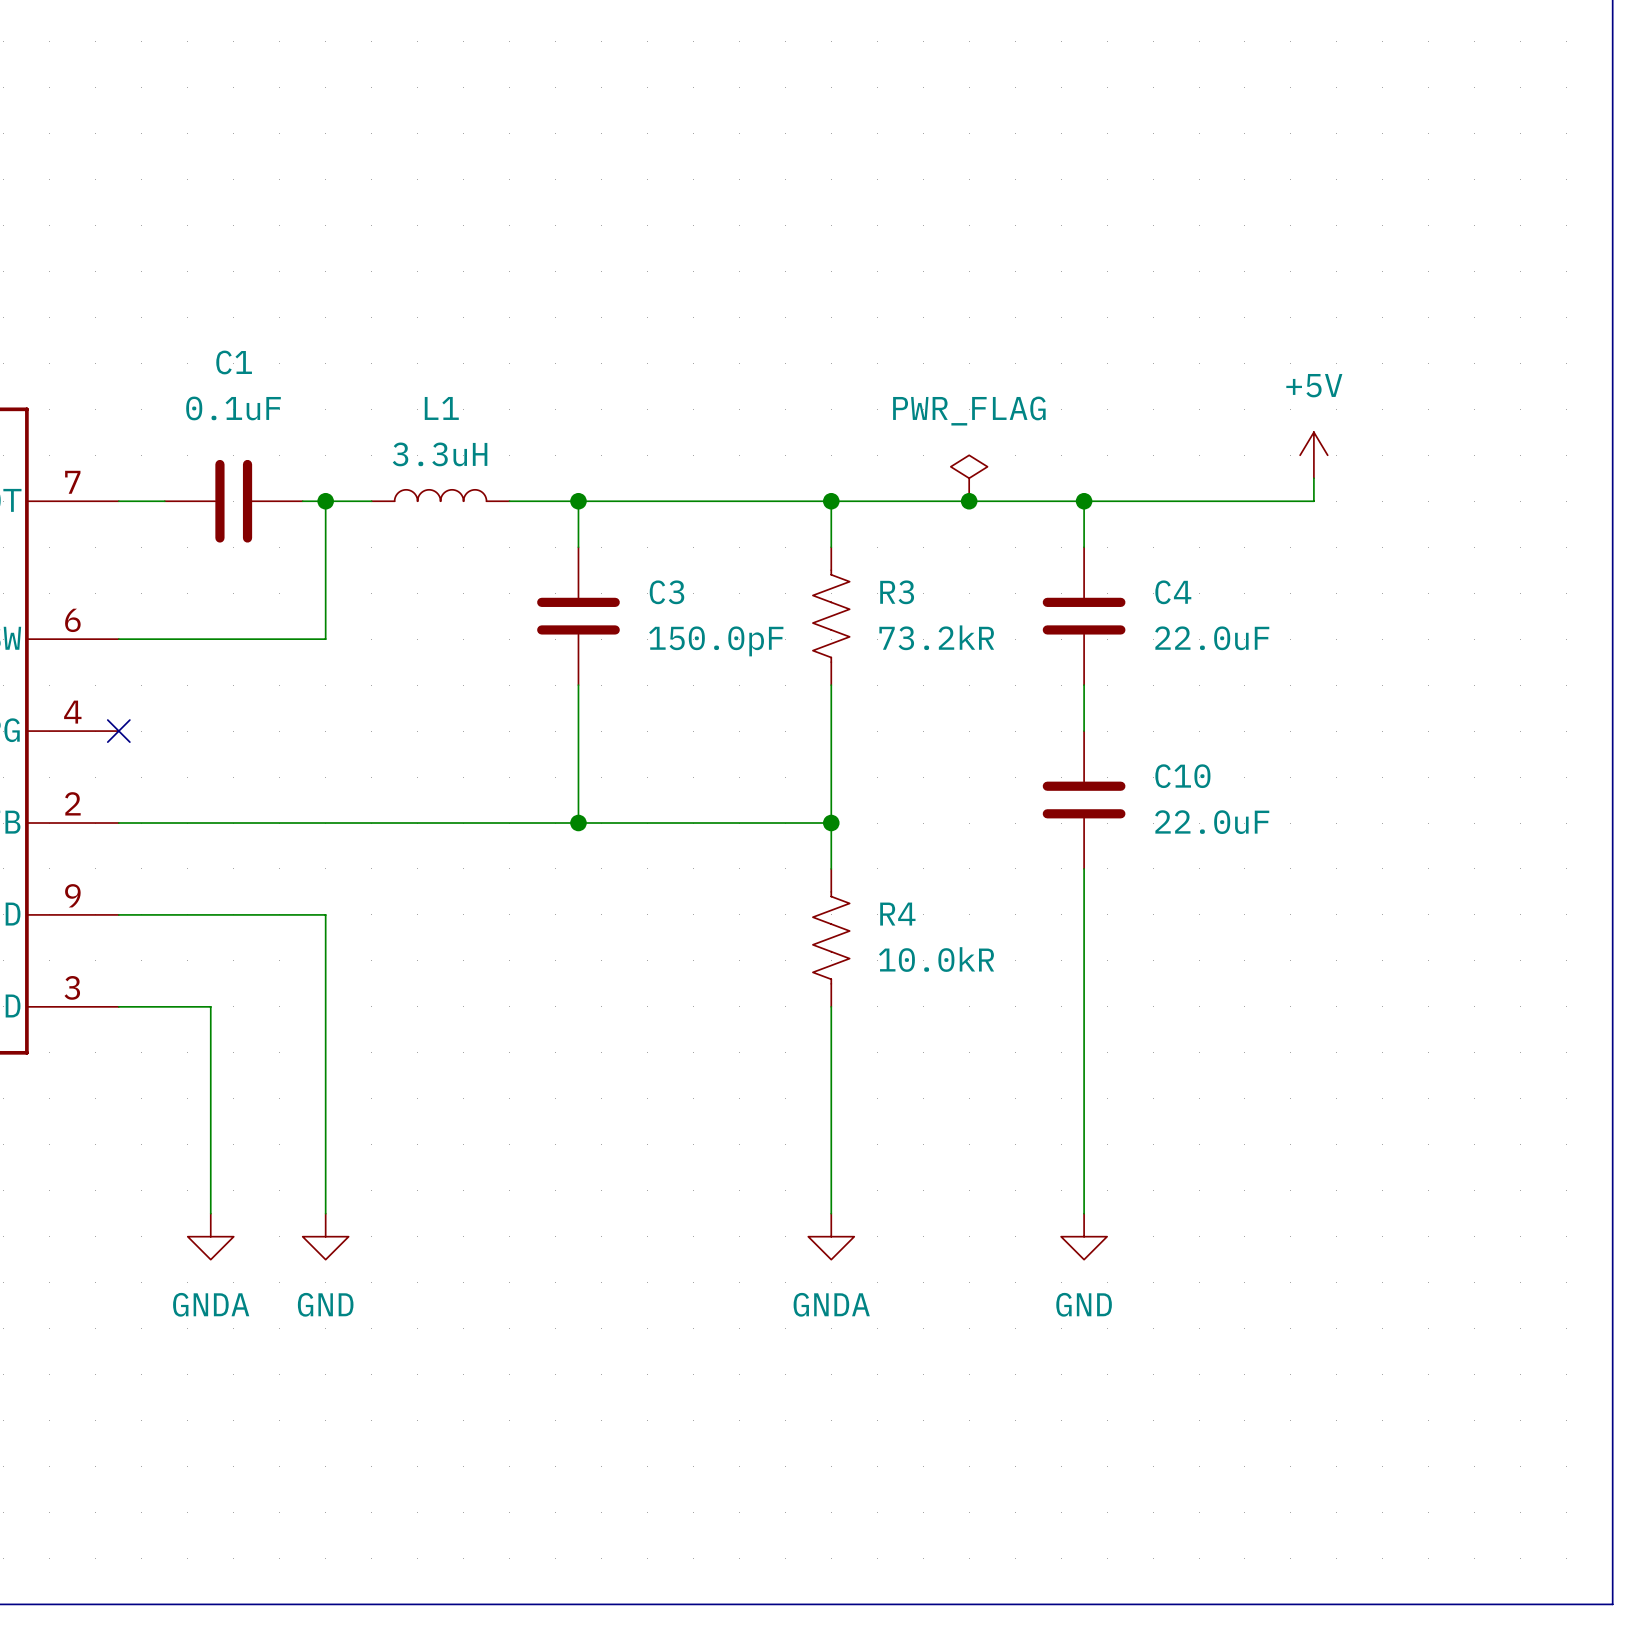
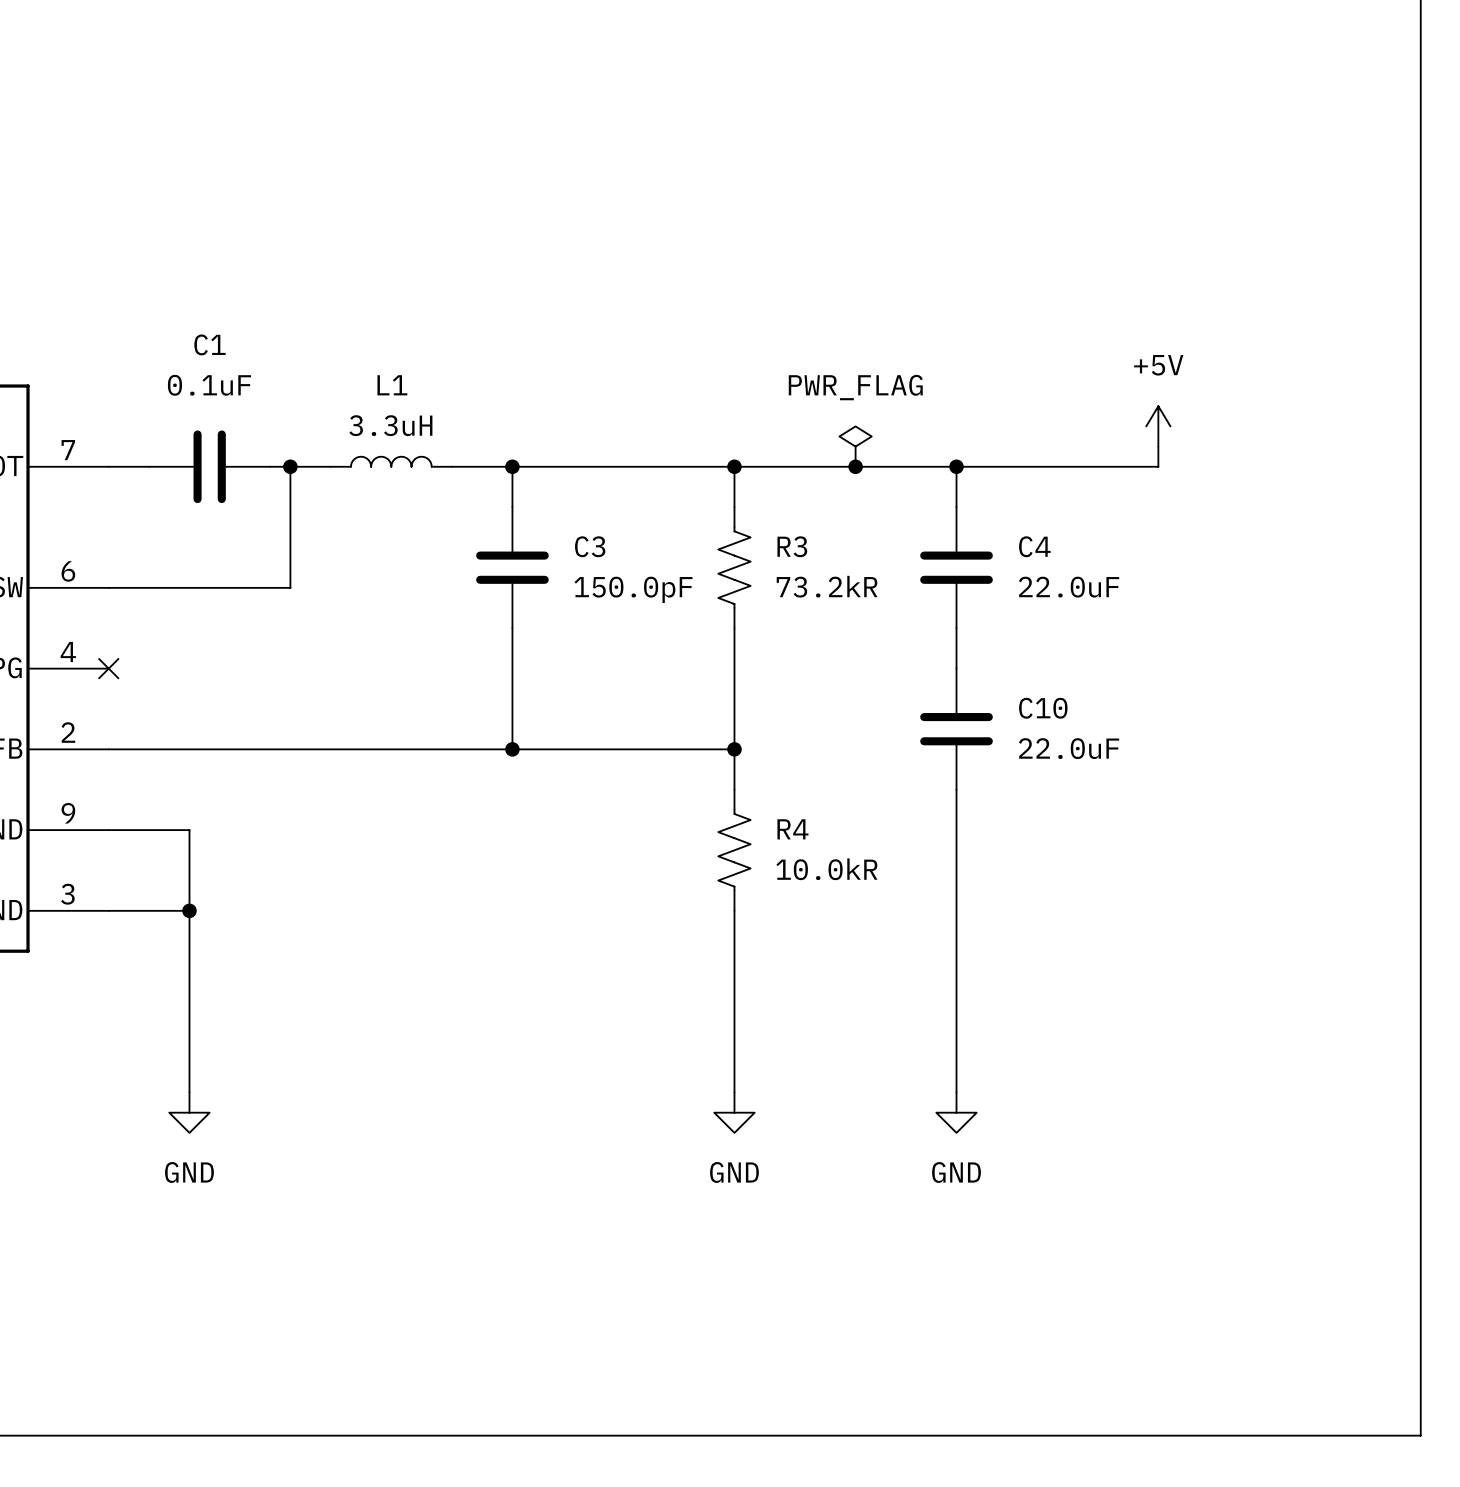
wire: (210, 914) (325, 914) (325, 1213) -> (189, 830) (189, 910)
junction: none -> (189, 910)
power symbol: GNDA (210, 1236) -> GND (189, 1112)
power symbol: GND (325, 1236) -> none
power symbol: GNDA (831, 1236) -> GND (734, 1112)

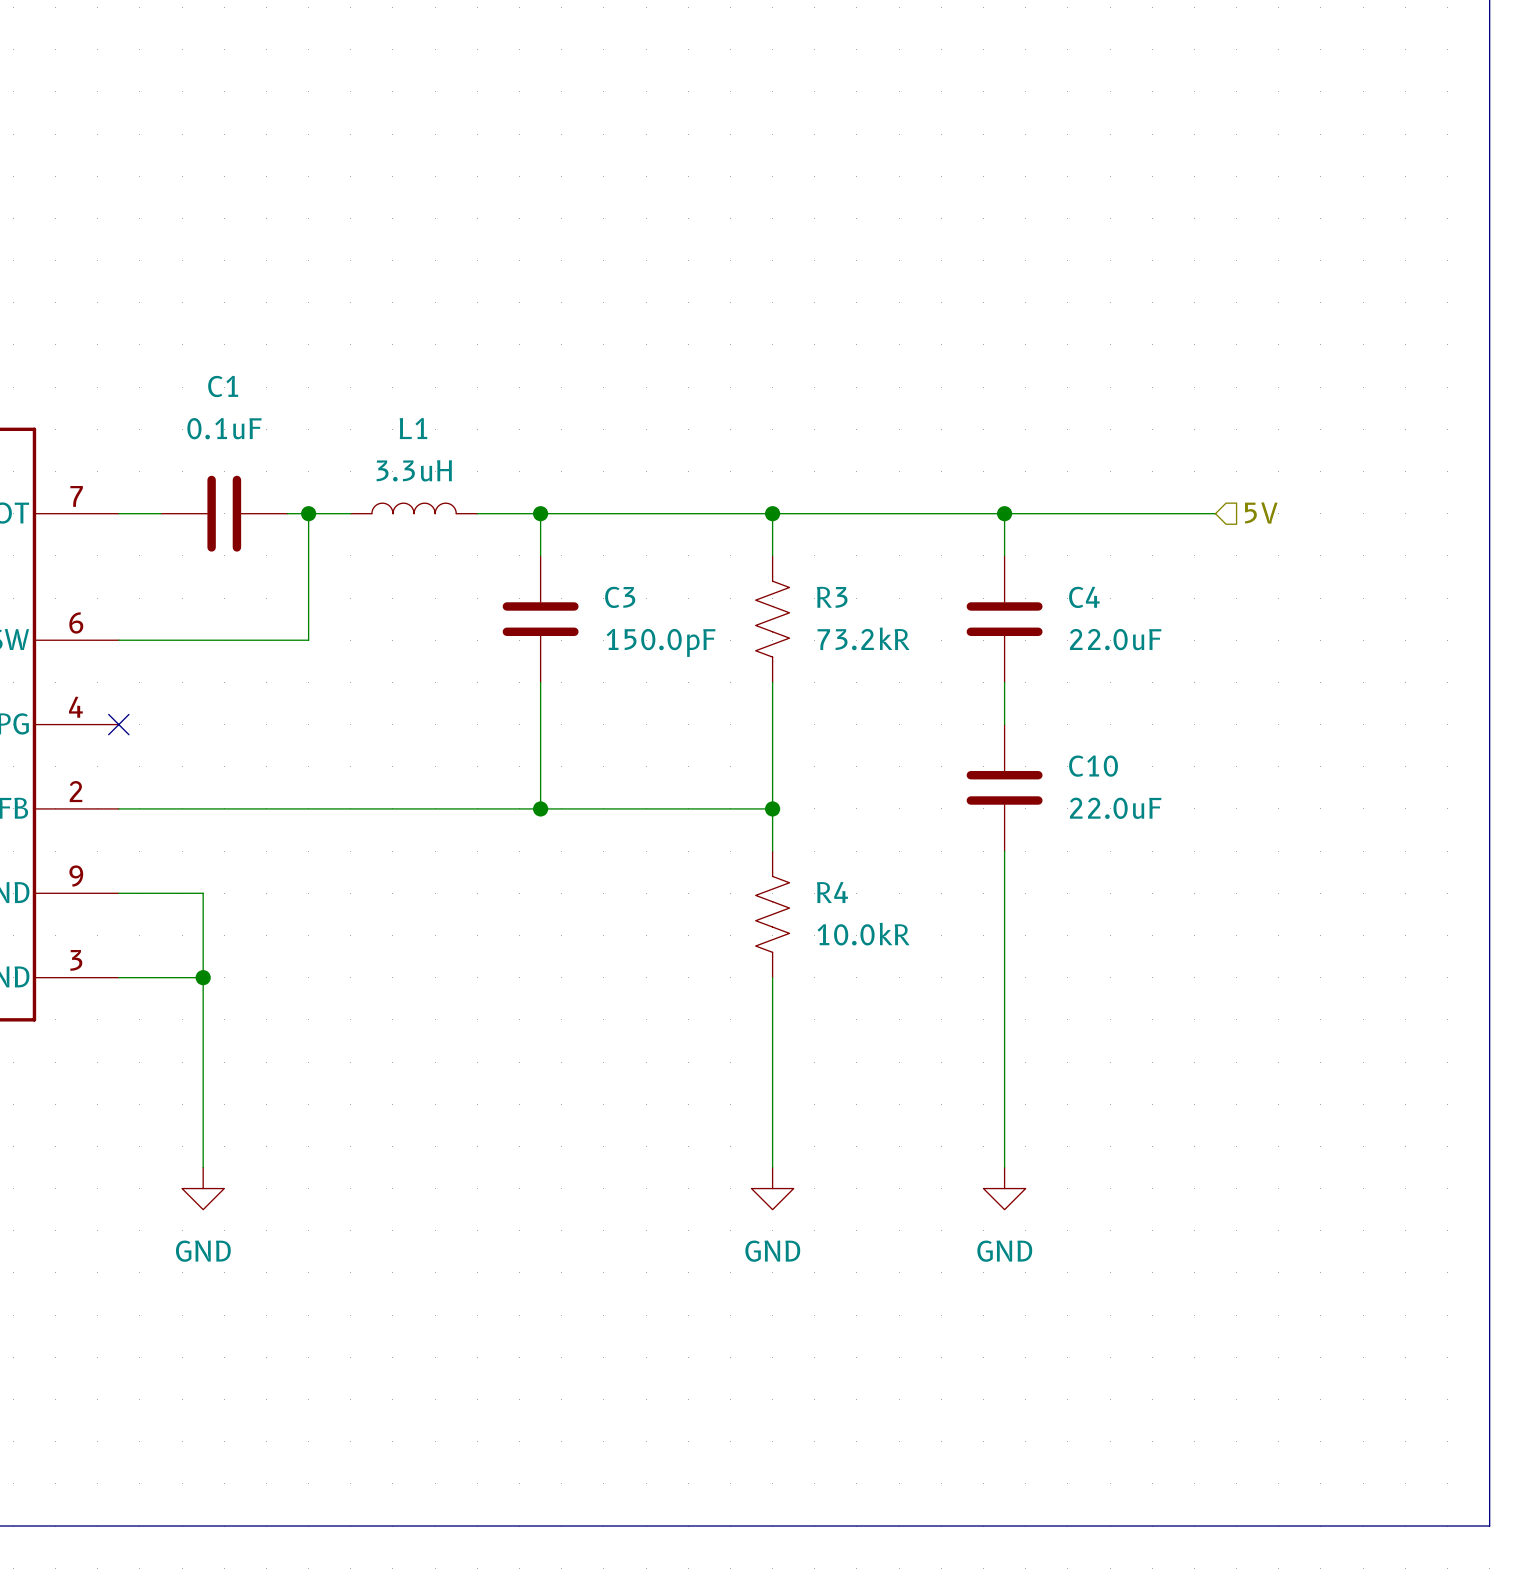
power symbol: +5V (1158, 426) -> none
power symbol: PWR_FLAG (855, 446) -> none
wire: (1158, 446) (1158, 466) -> none
junction: (855, 466) -> none
hierarchical label: none -> 5V (1261, 513)

